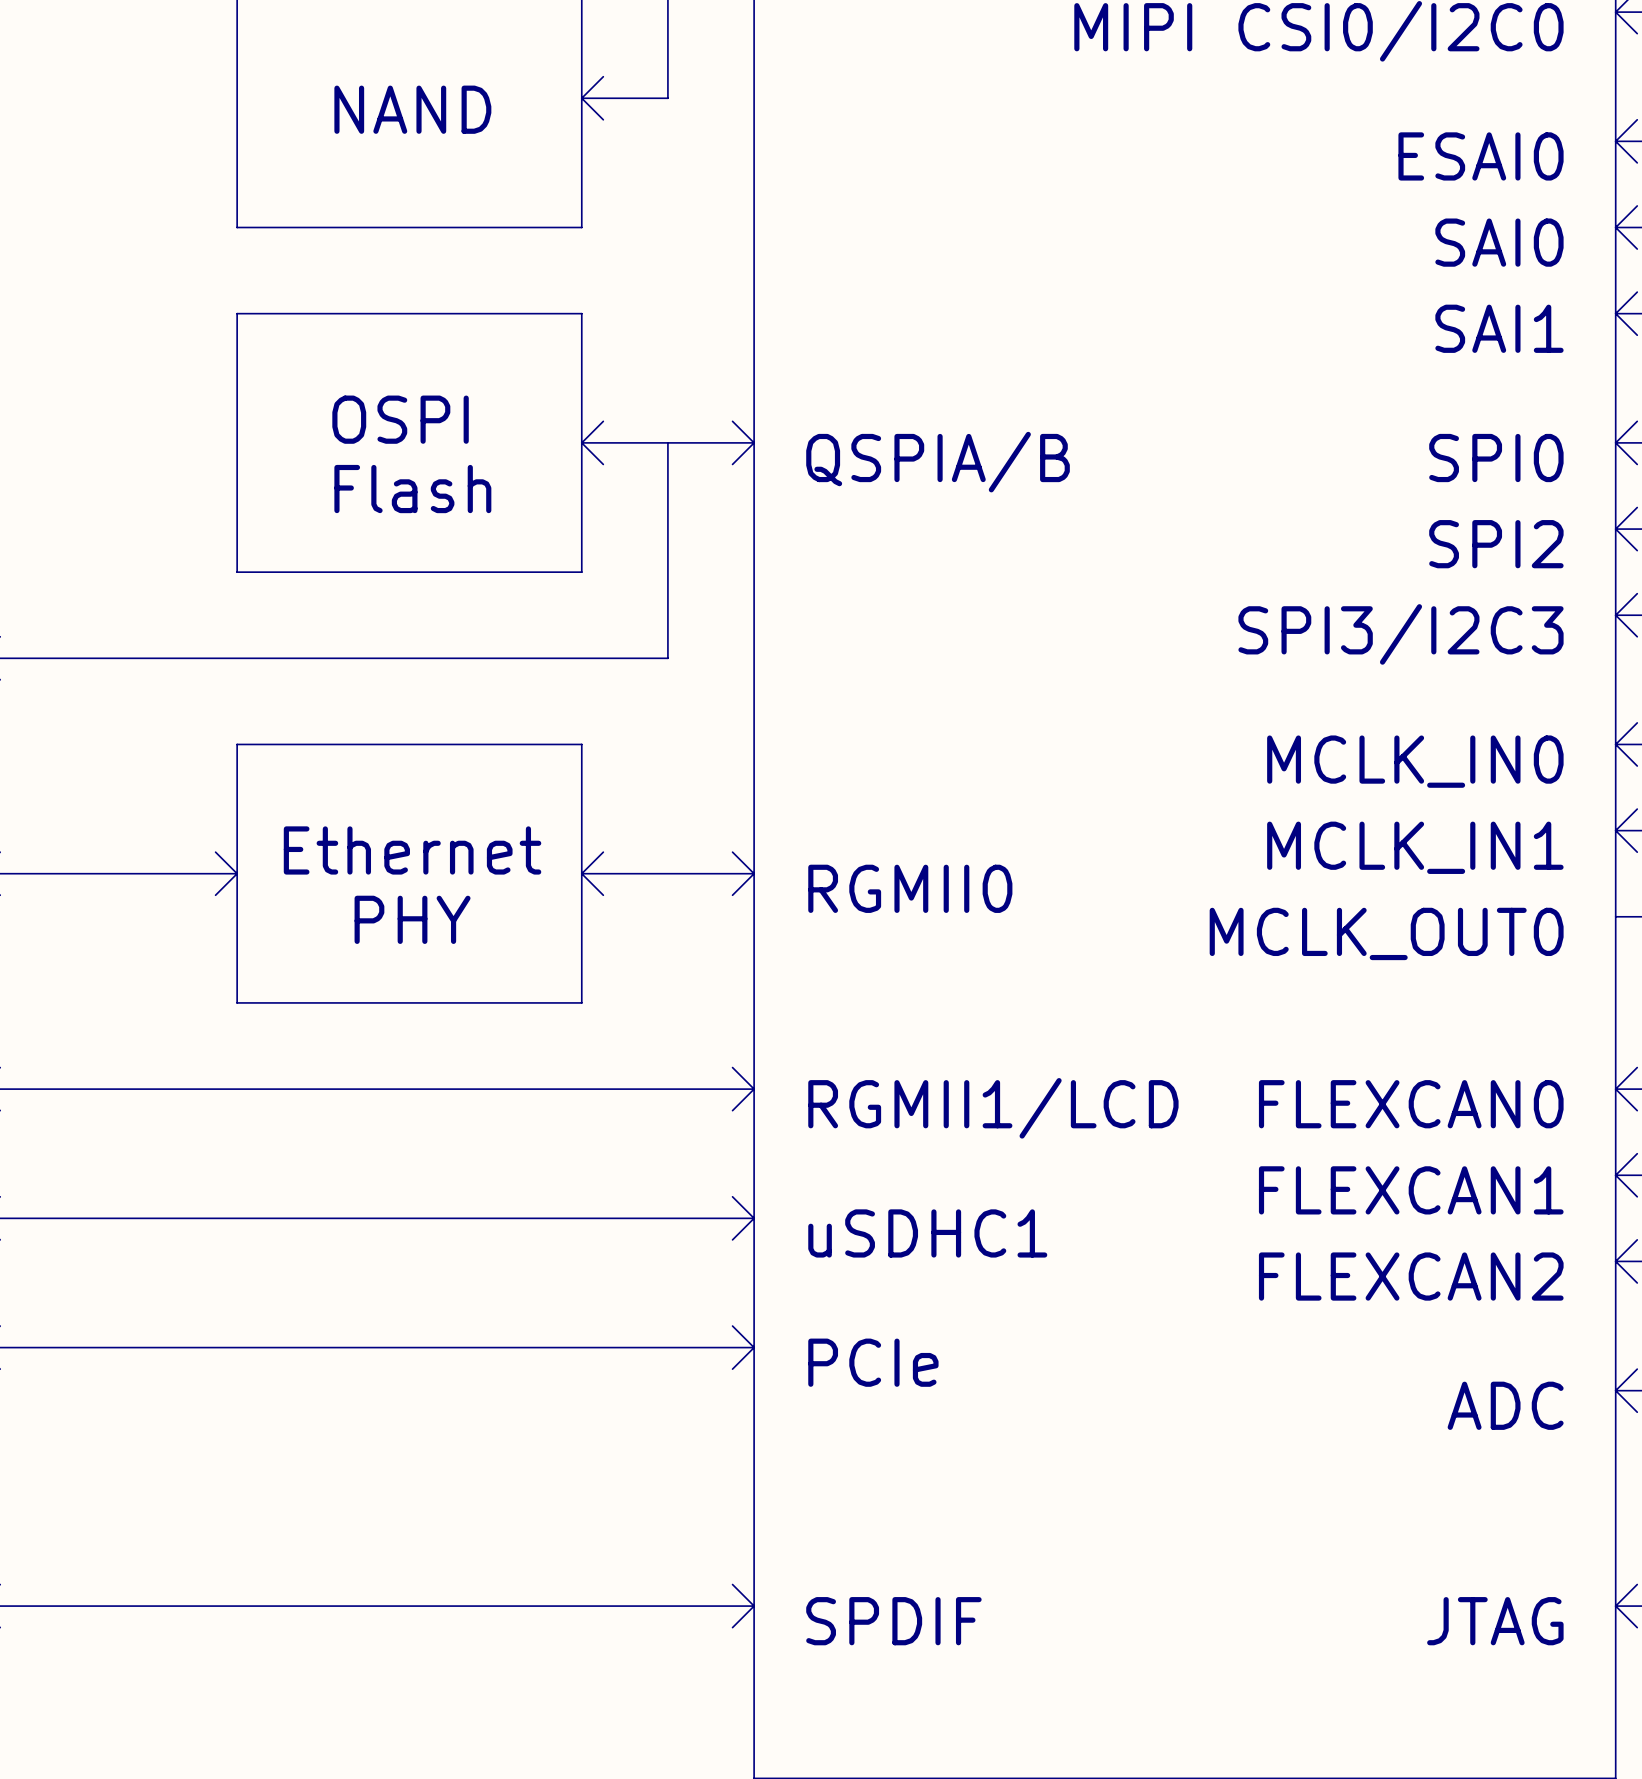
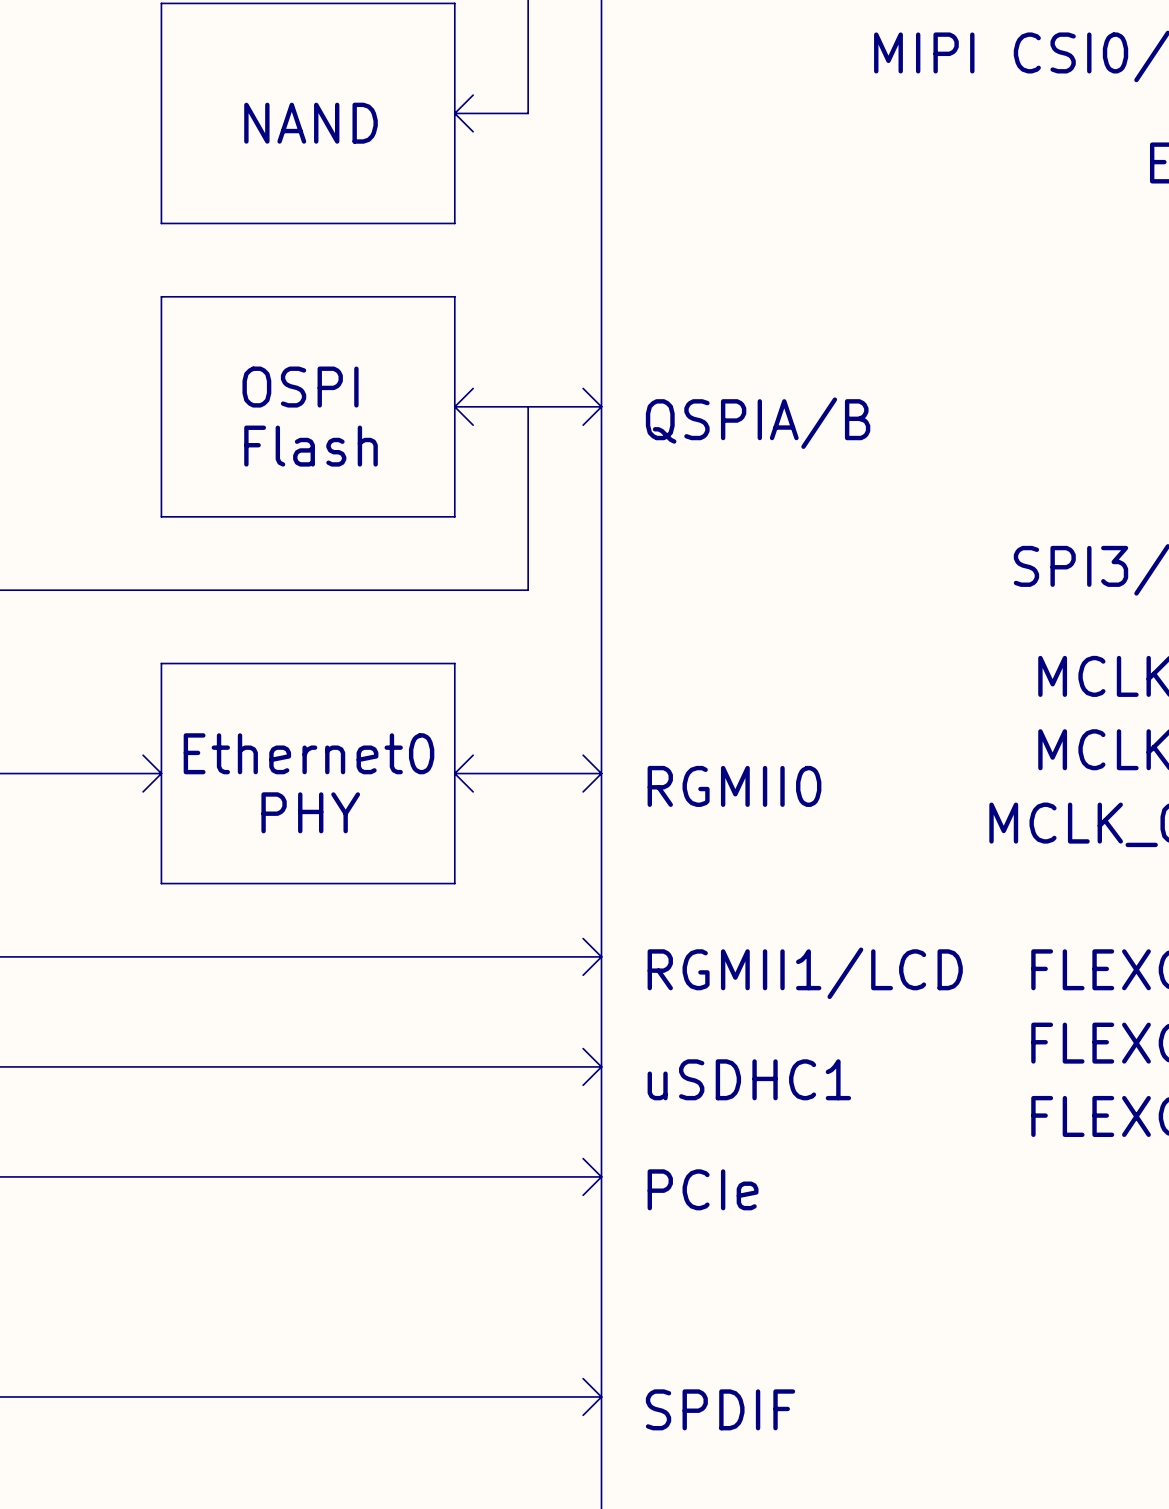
text: Ethernet (412, 850) -> Ethernet0 (308, 753)

